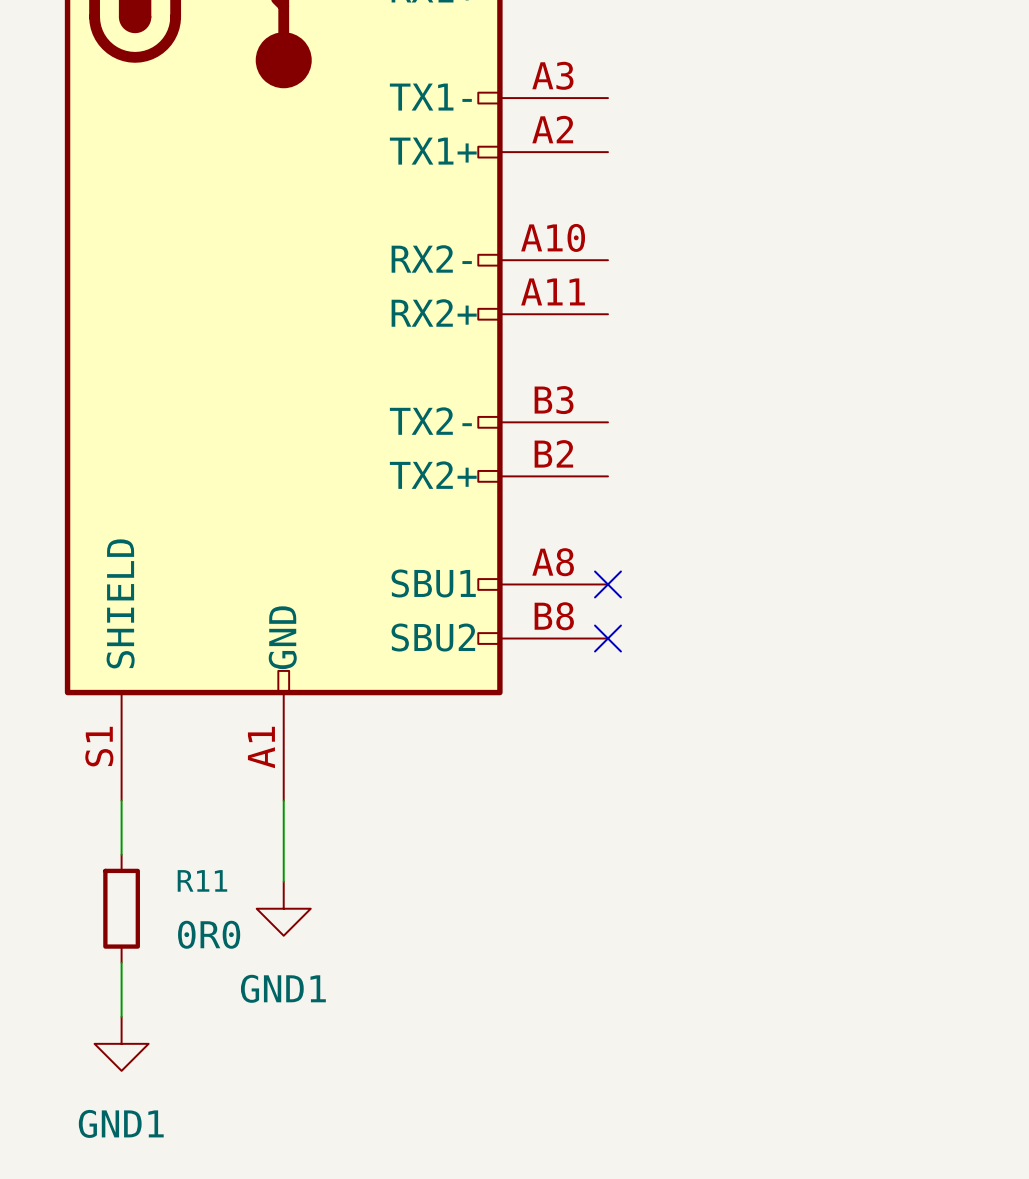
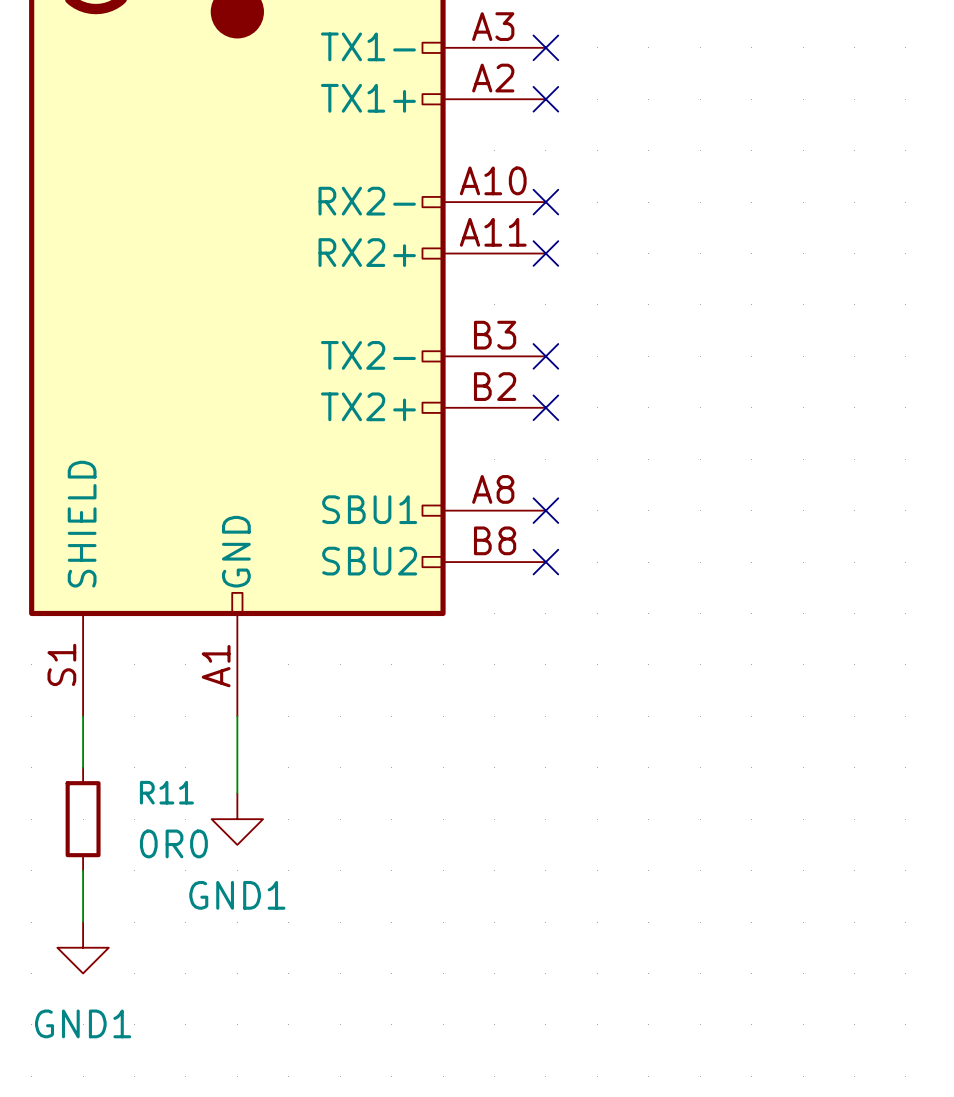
no-connect mark: none -> (545, 47)
no-connect mark: none -> (545, 99)
no-connect mark: none -> (545, 202)
no-connect mark: none -> (545, 253)
no-connect mark: none -> (545, 356)
no-connect mark: none -> (545, 407)

